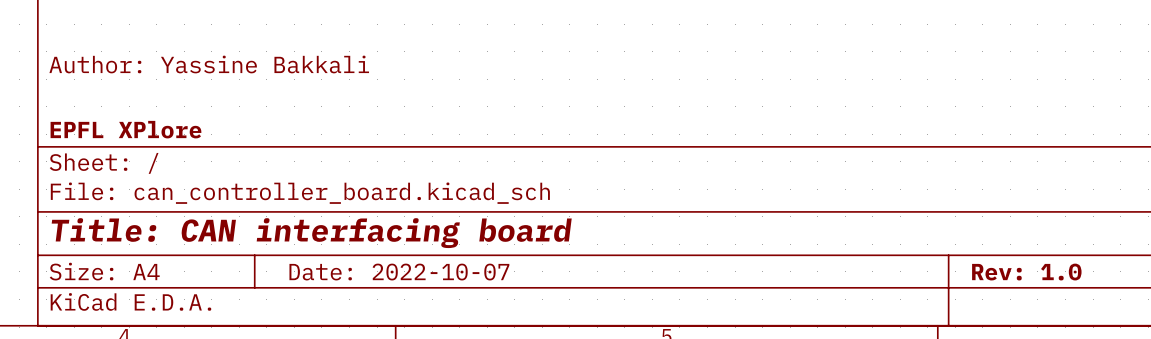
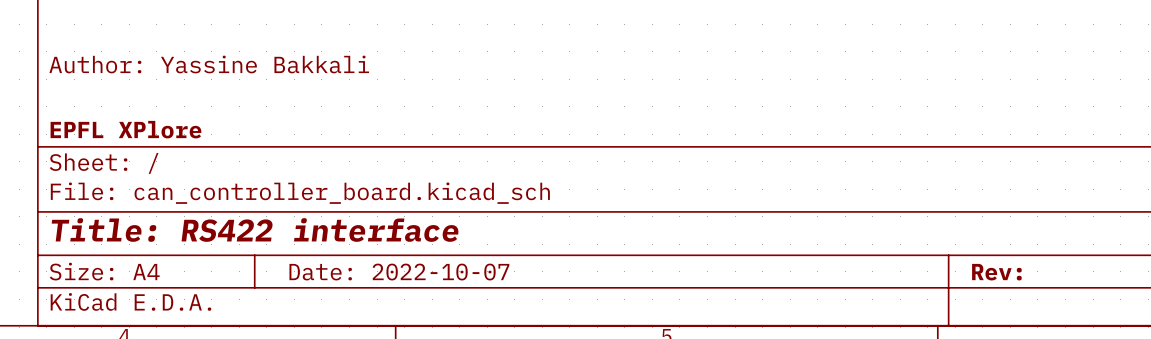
title block: Title: CAN interfacing board (311, 233) -> Title: RS422 interface (255, 229)
title block: Rev: 1.0 (1026, 272) -> Rev: (996, 272)

